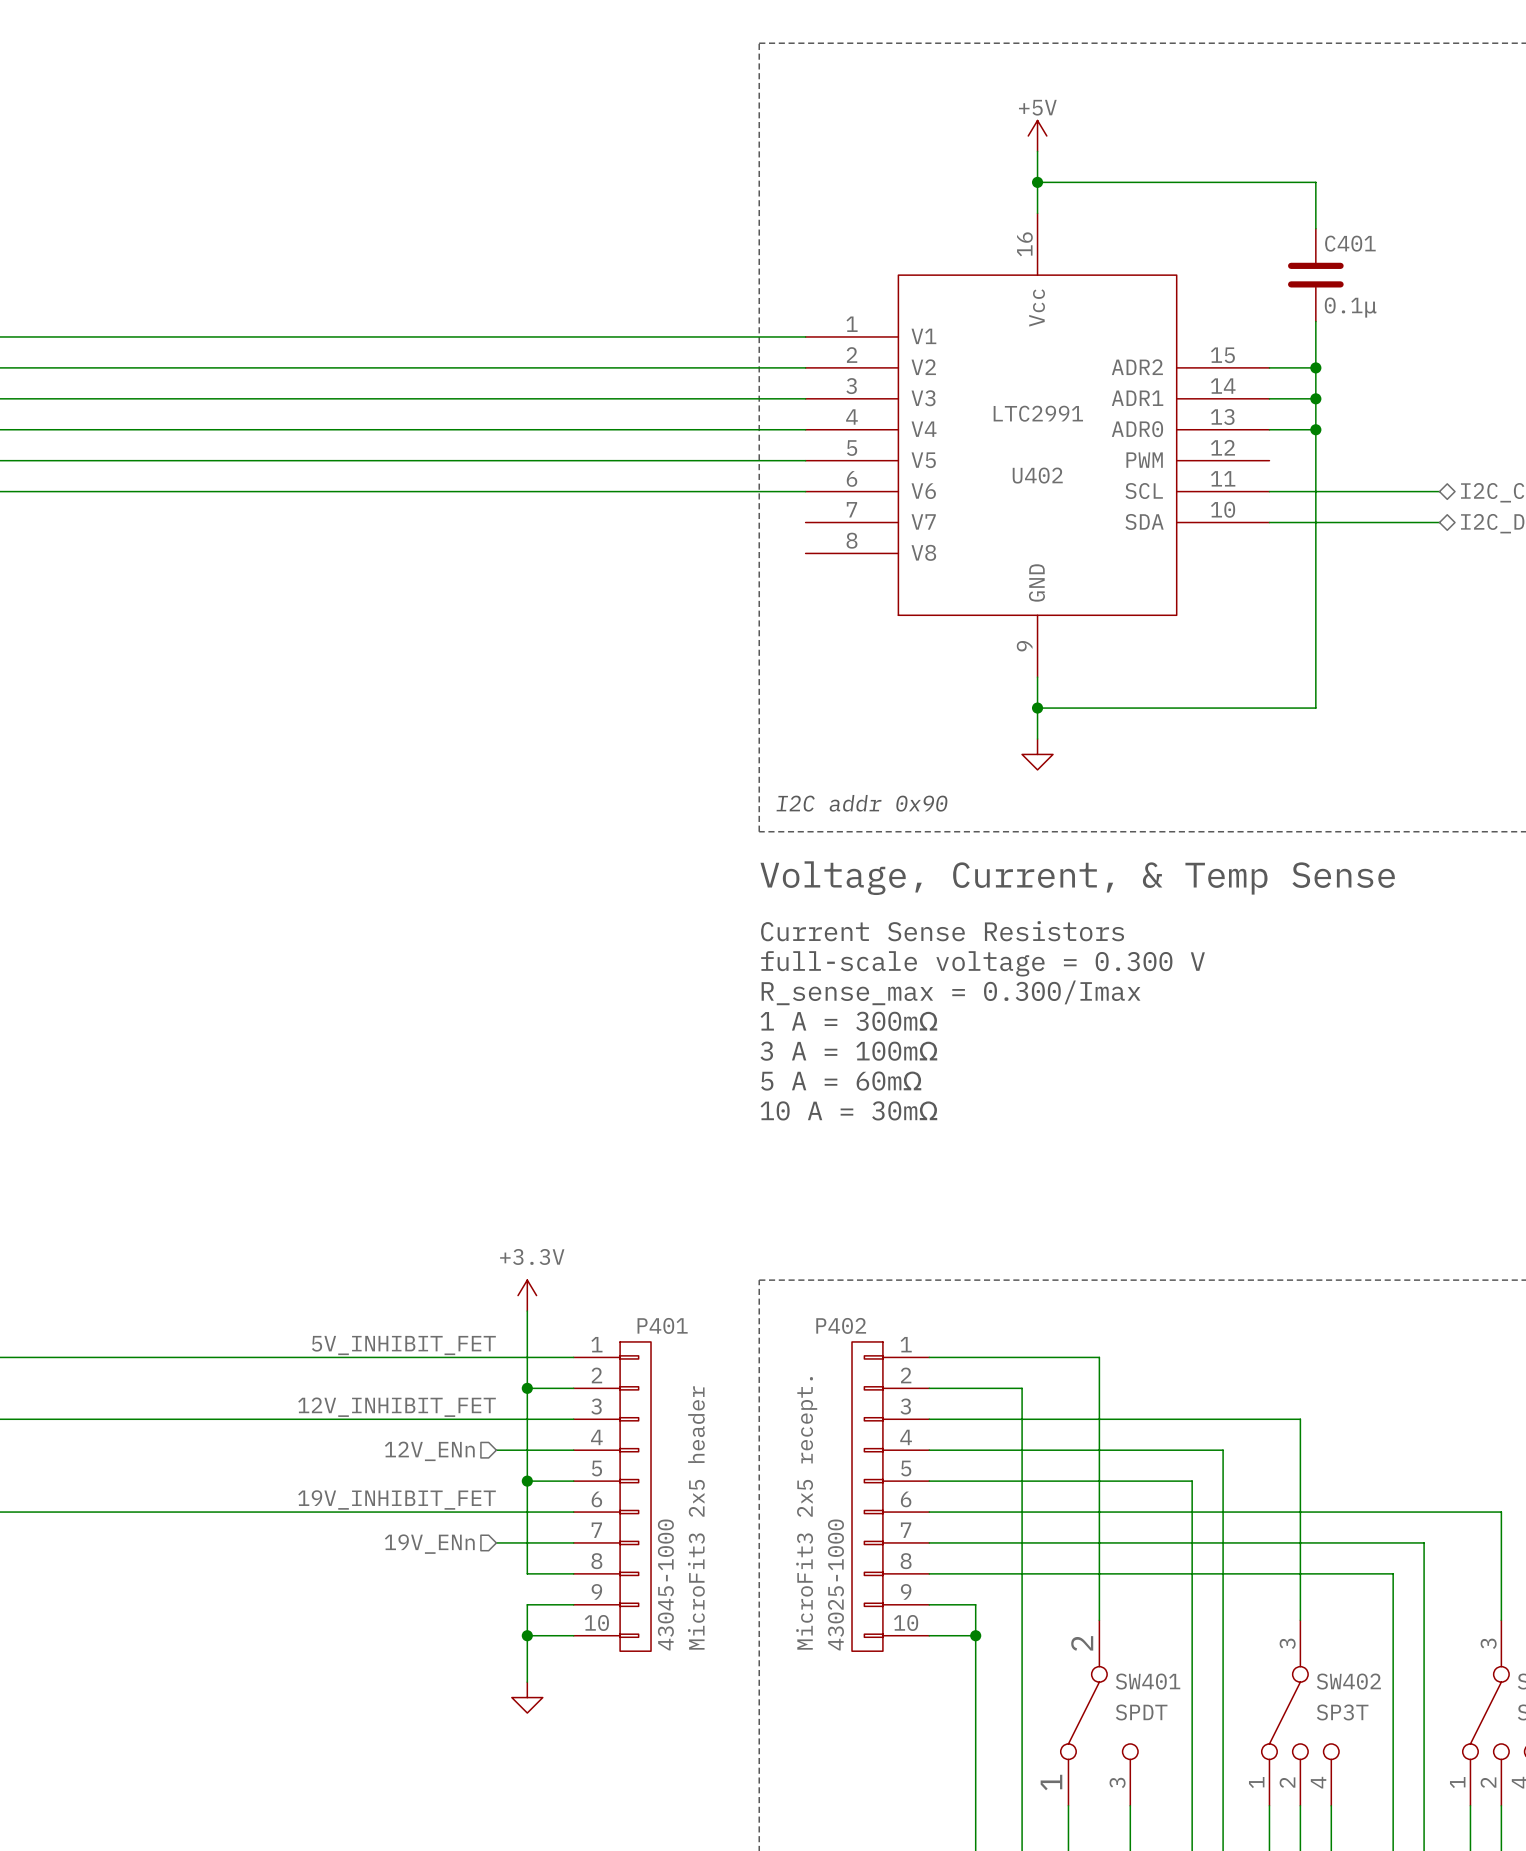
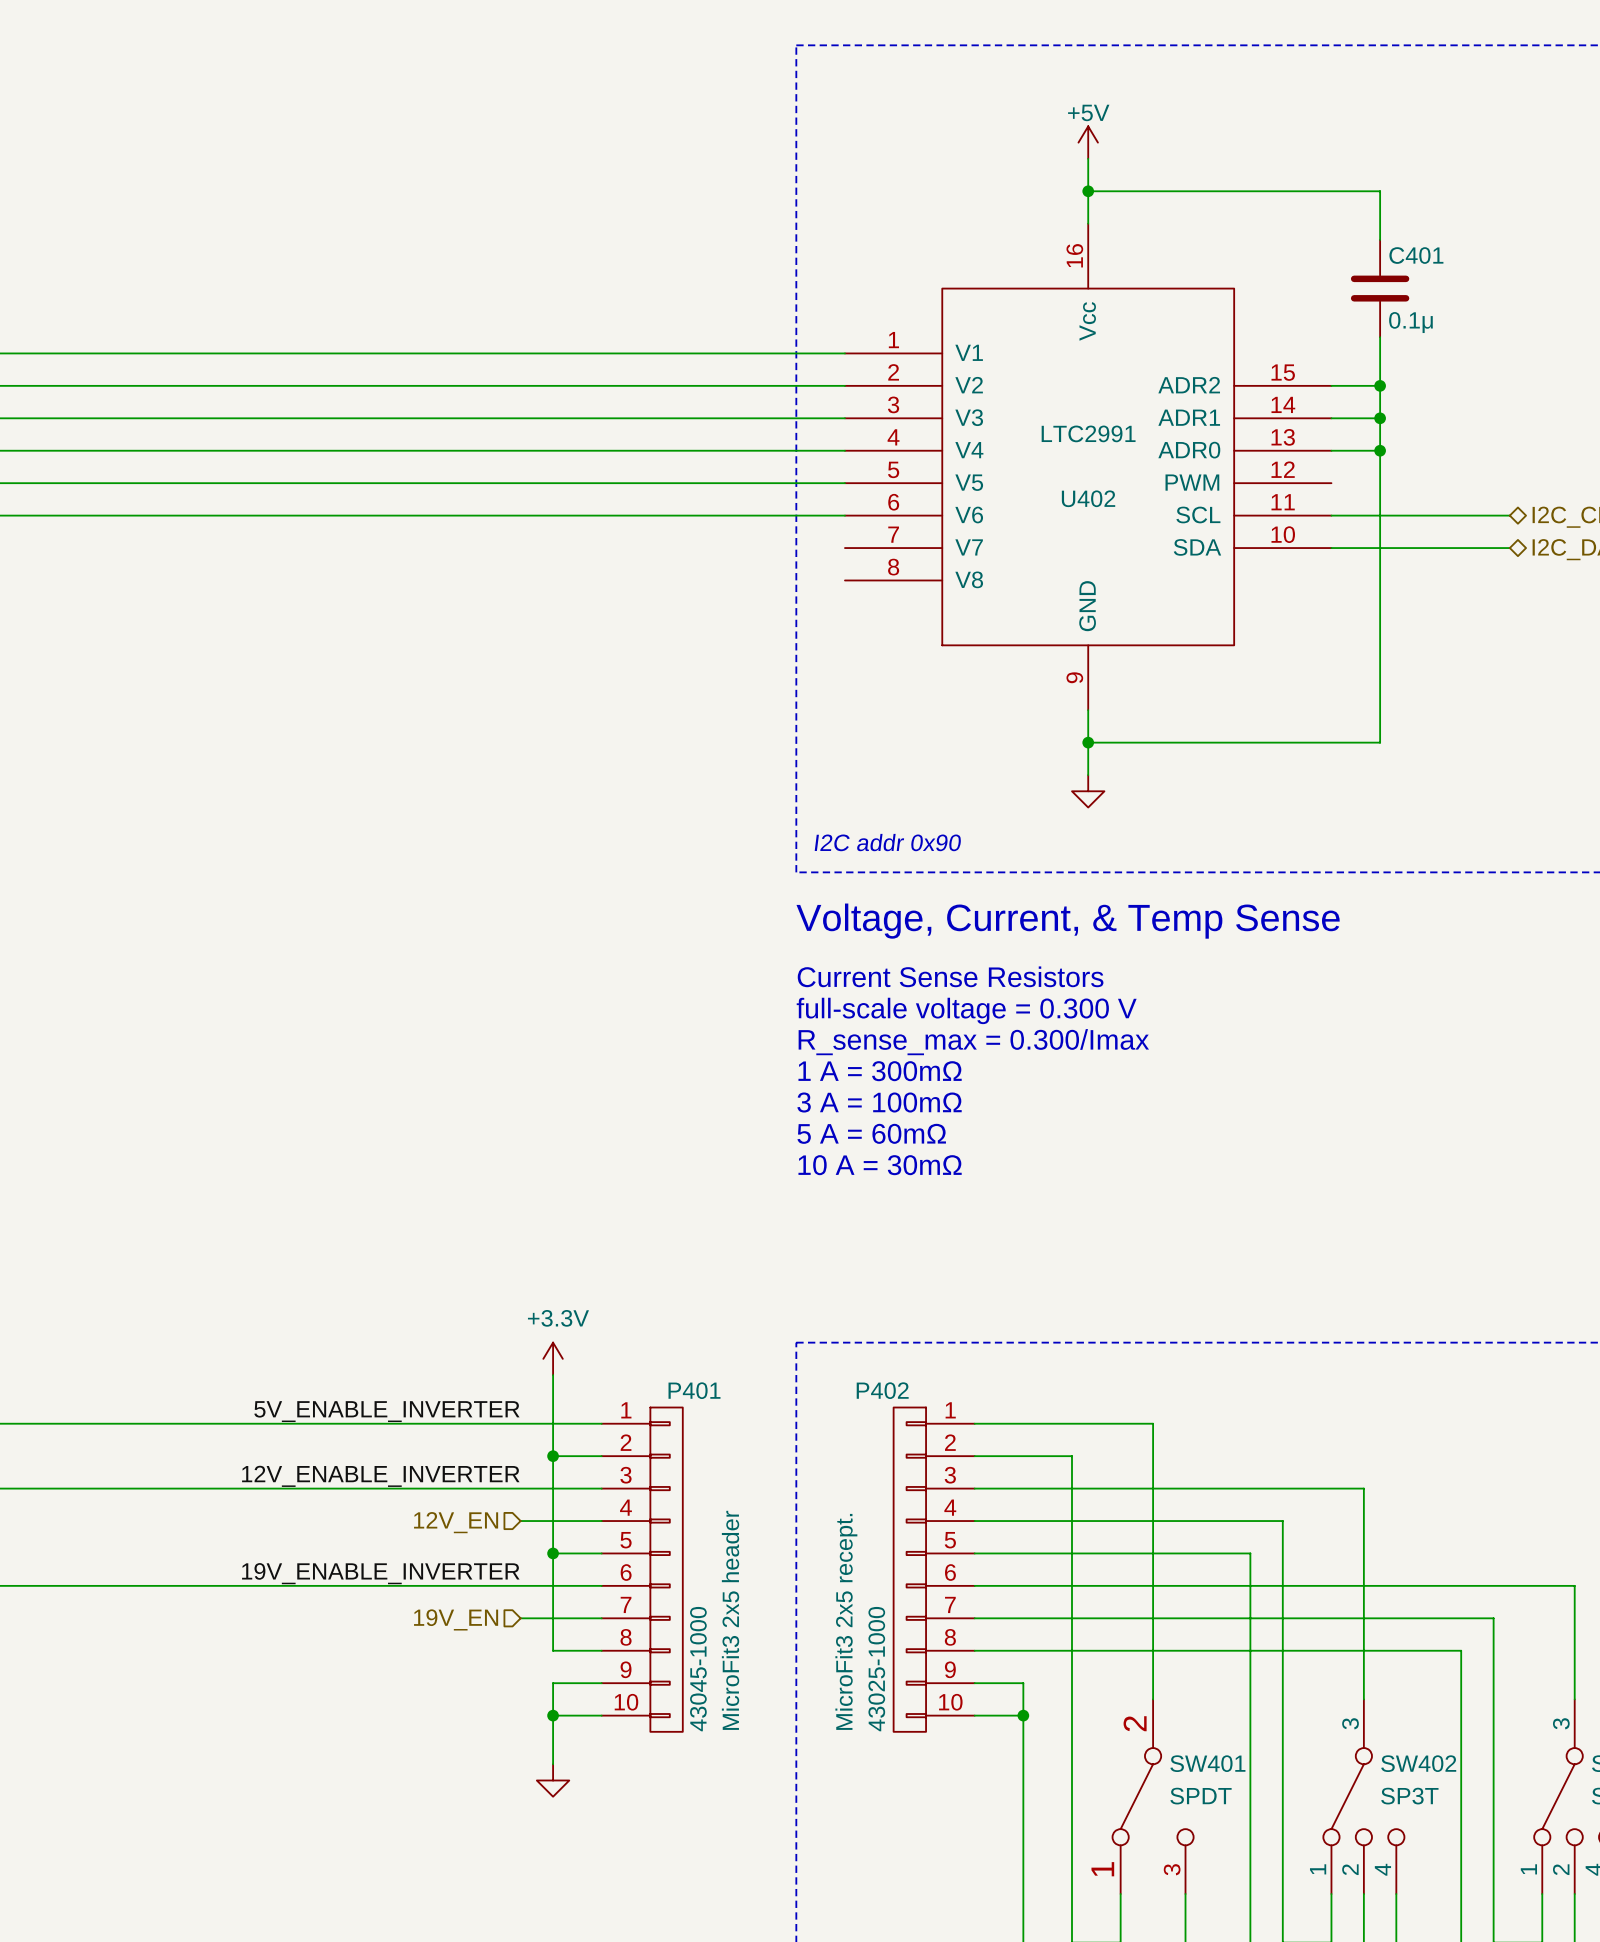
label: 5V_INHIBIT_FET (403, 1345) -> 5V_ENABLE_INVERTER (386, 1411)
label: 12V_INHIBIT_FET (397, 1407) -> 12V_ENABLE_INVERTER (380, 1476)
hierarchical label: 12V_ENn (429, 1451) -> 12V_EN (456, 1522)
label: 19V_INHIBIT_FET (397, 1499) -> 19V_ENABLE_INVERTER (380, 1573)
hierarchical label: 19V_ENn (429, 1544) -> 19V_EN (456, 1619)

